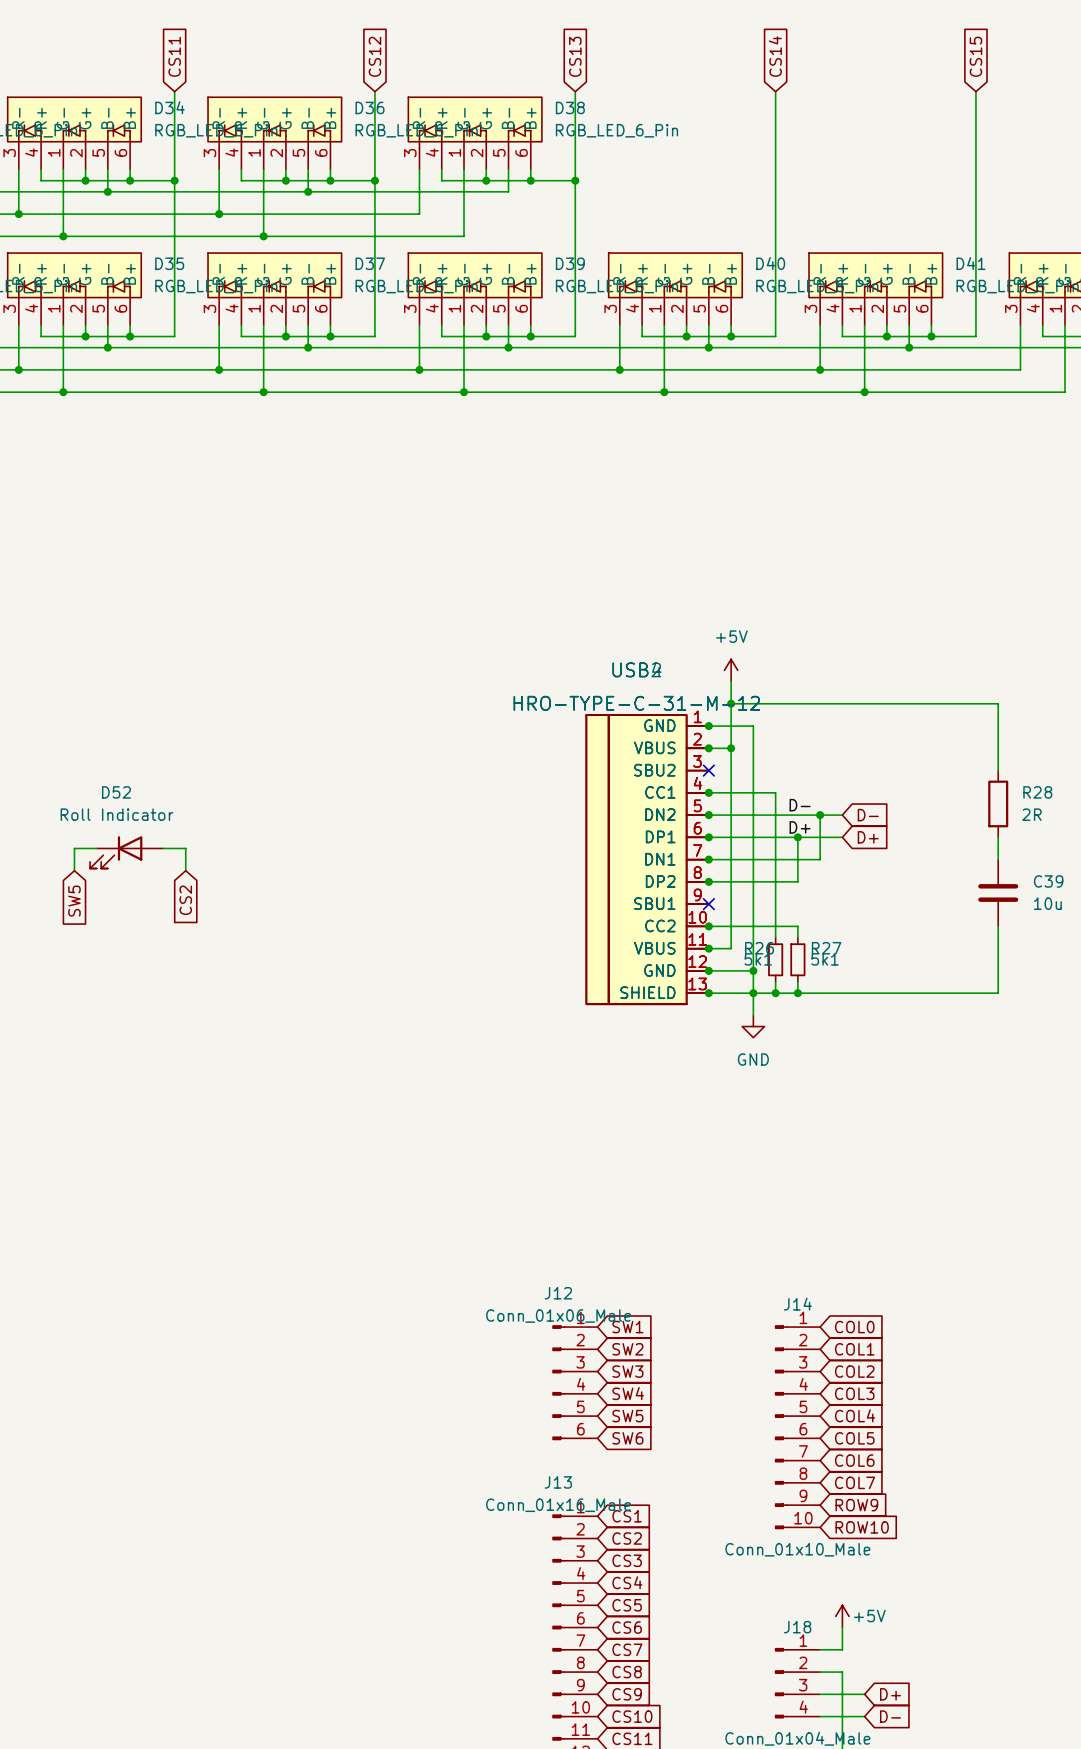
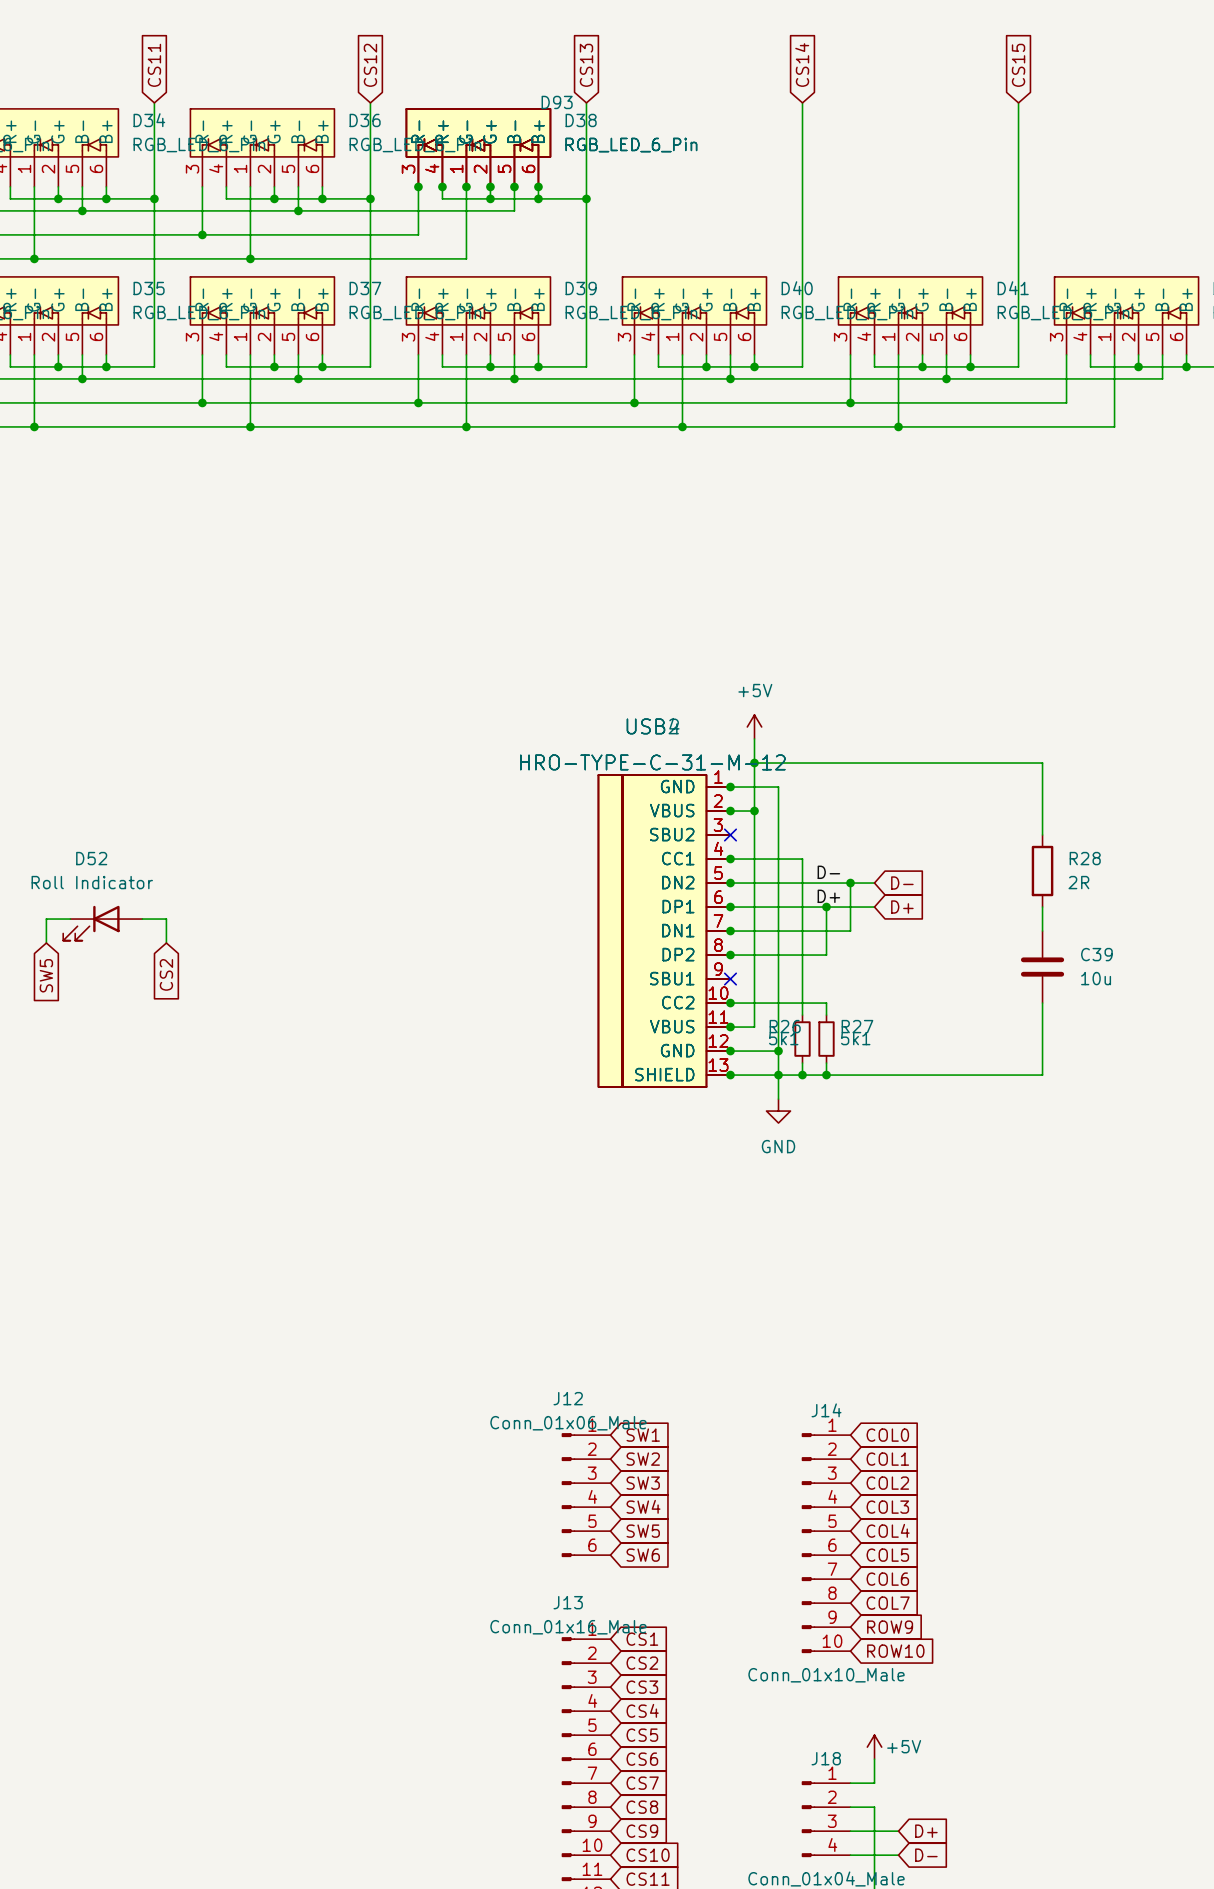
D93: none -> RGB_LED_6_Pin (478, 147)
junction: none -> (418, 186)
junction: none -> (442, 186)
junction: none -> (466, 186)
junction: none -> (490, 186)
junction: none -> (514, 186)
junction: none -> (538, 186)

